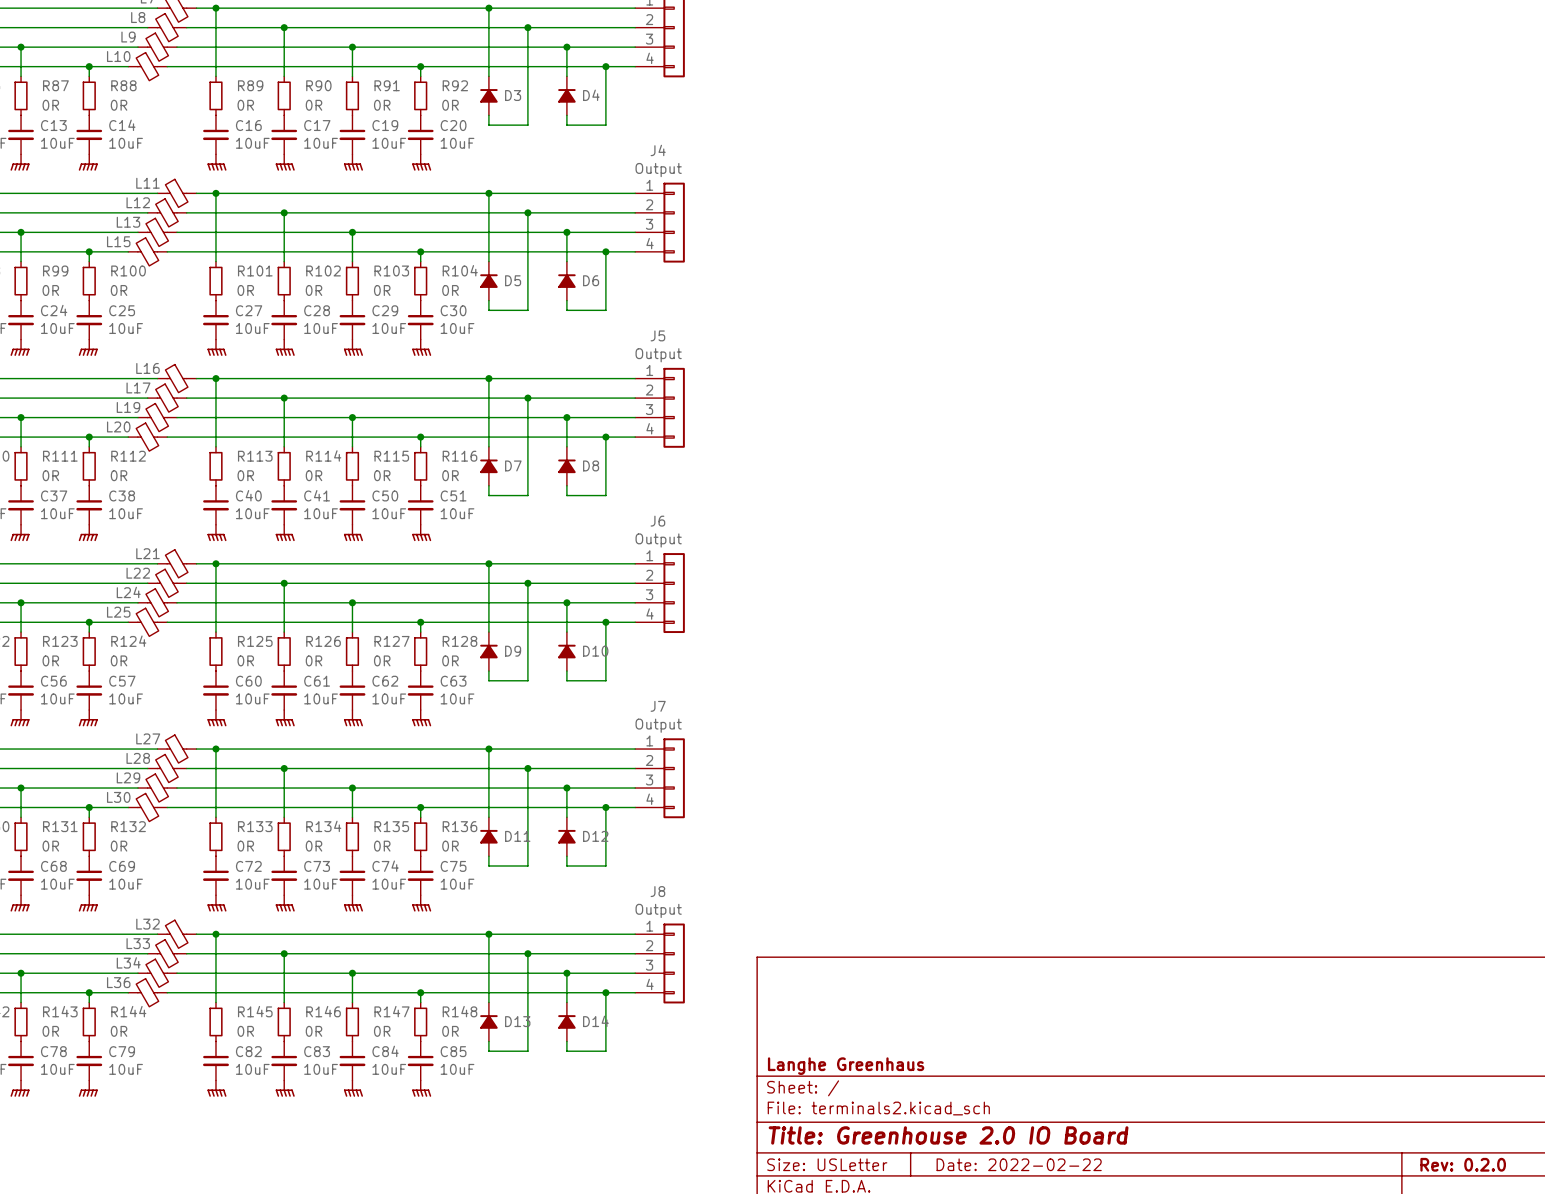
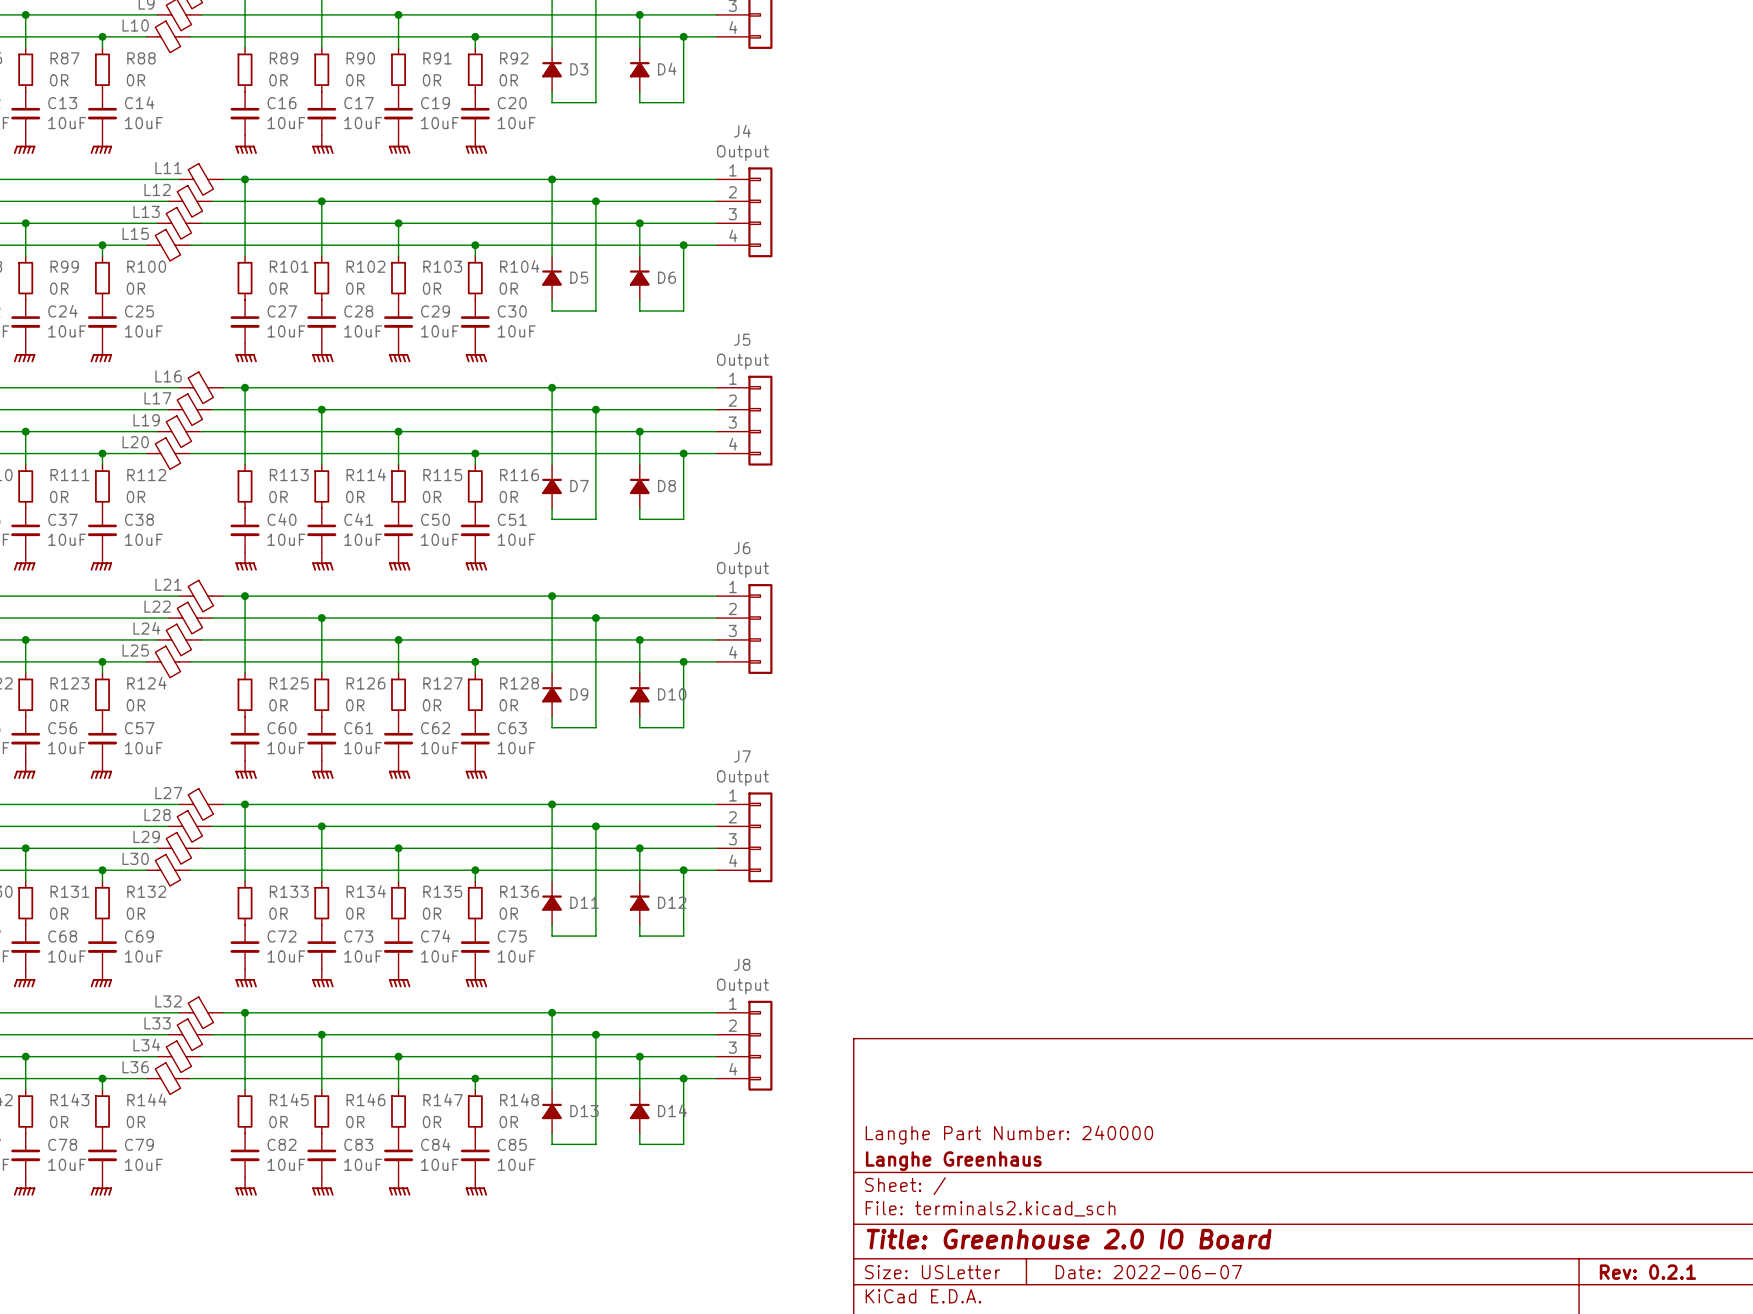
title block: none -> Langhe Part Number: 240000 (1009, 1134)
title block: Date: 2022-02-22 (1019, 1164) -> Date: 2022-06-07 (1148, 1272)
title block: Rev: 0.2.0 (1463, 1164) -> Rev: 0.2.1 (1647, 1272)

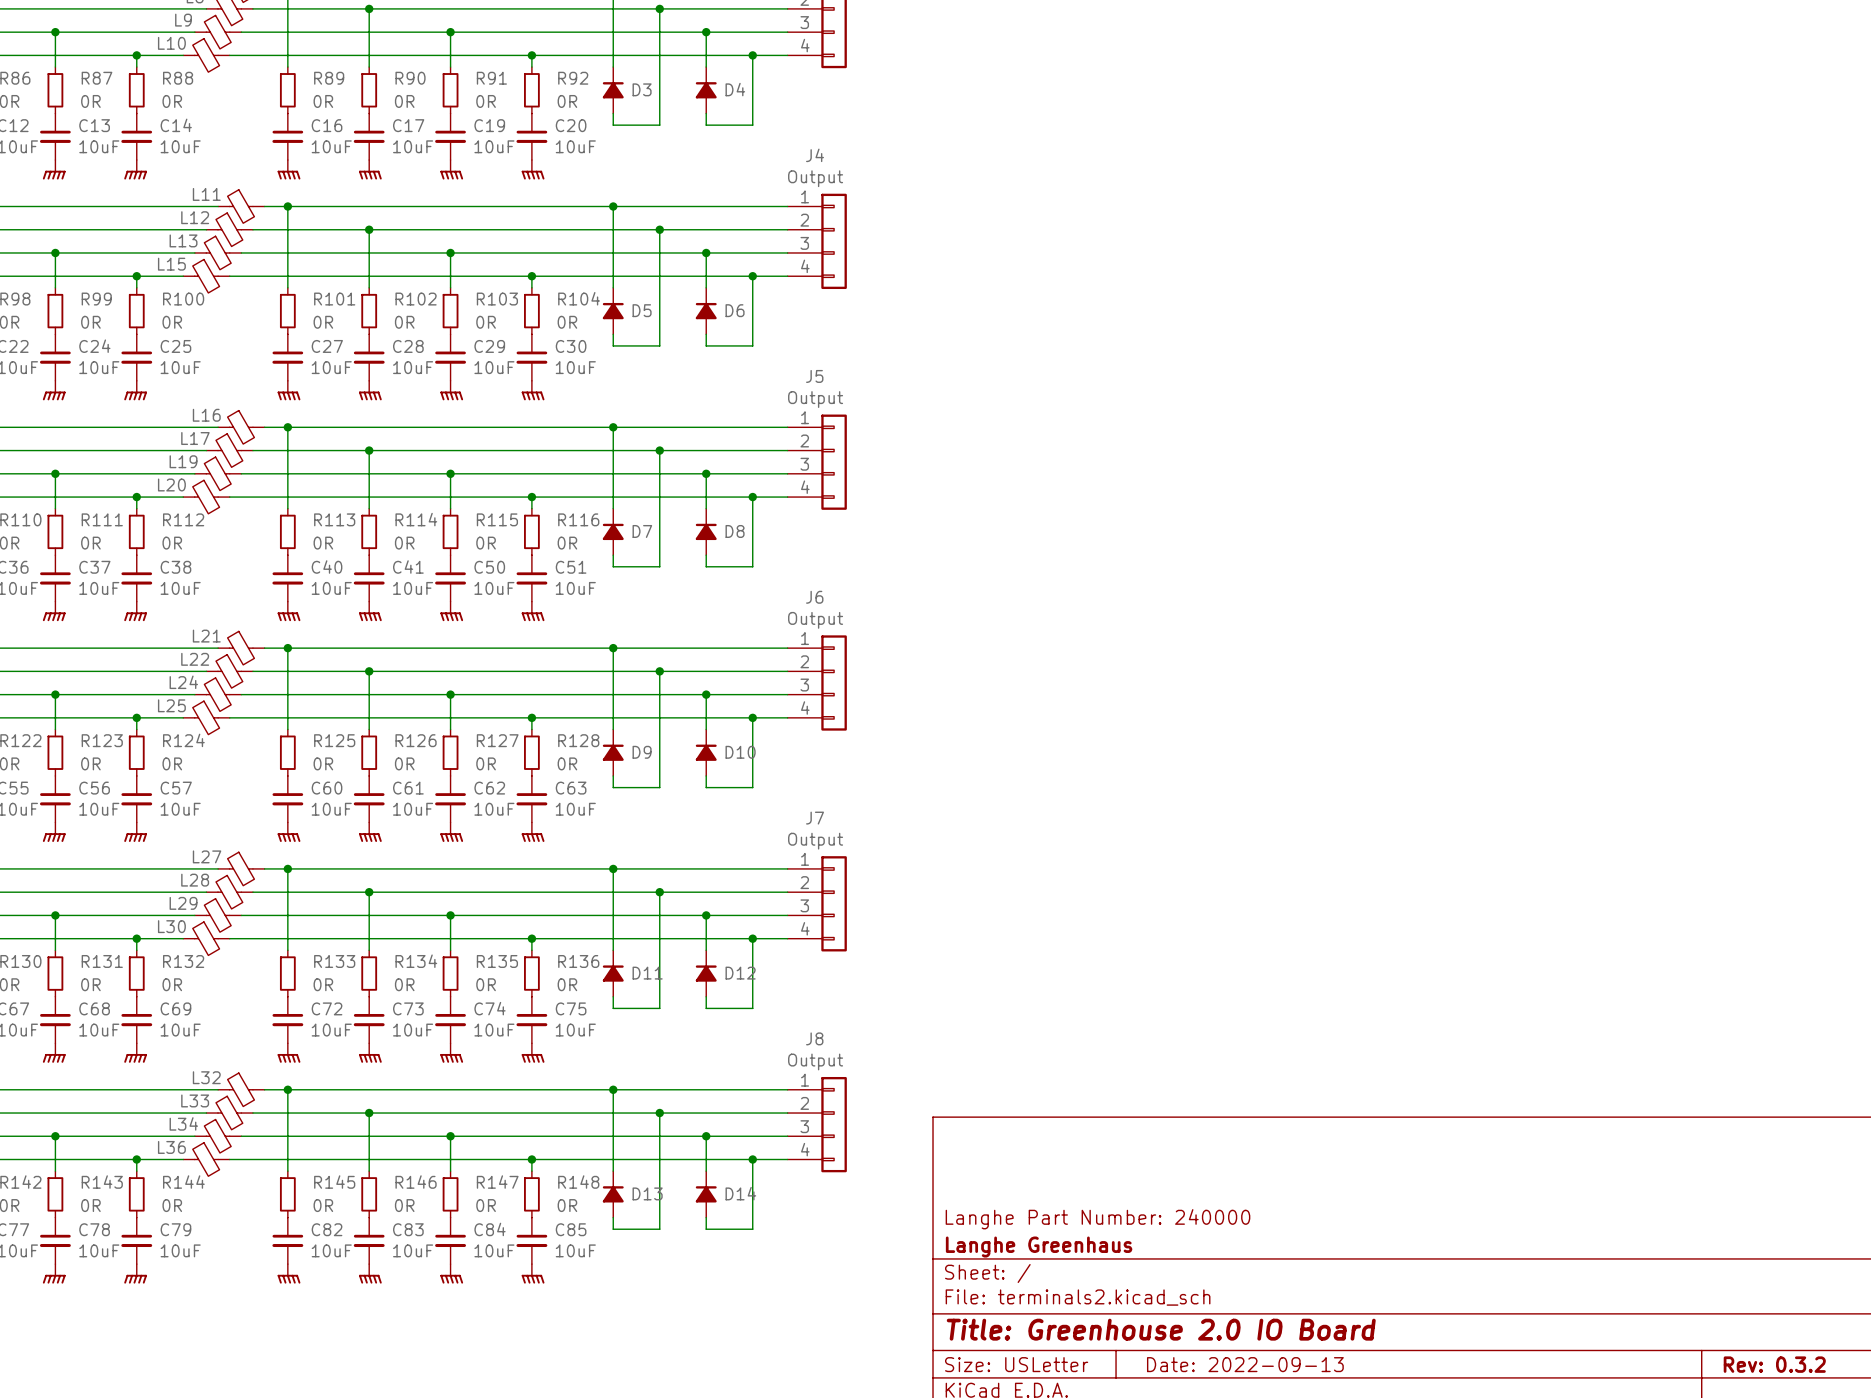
title block: Date: 2022-06-07 (1148, 1272) -> Date: 2022-09-13 (1245, 1364)
title block: Rev: 0.2.1 (1647, 1272) -> Rev: 0.3.2 (1774, 1364)

